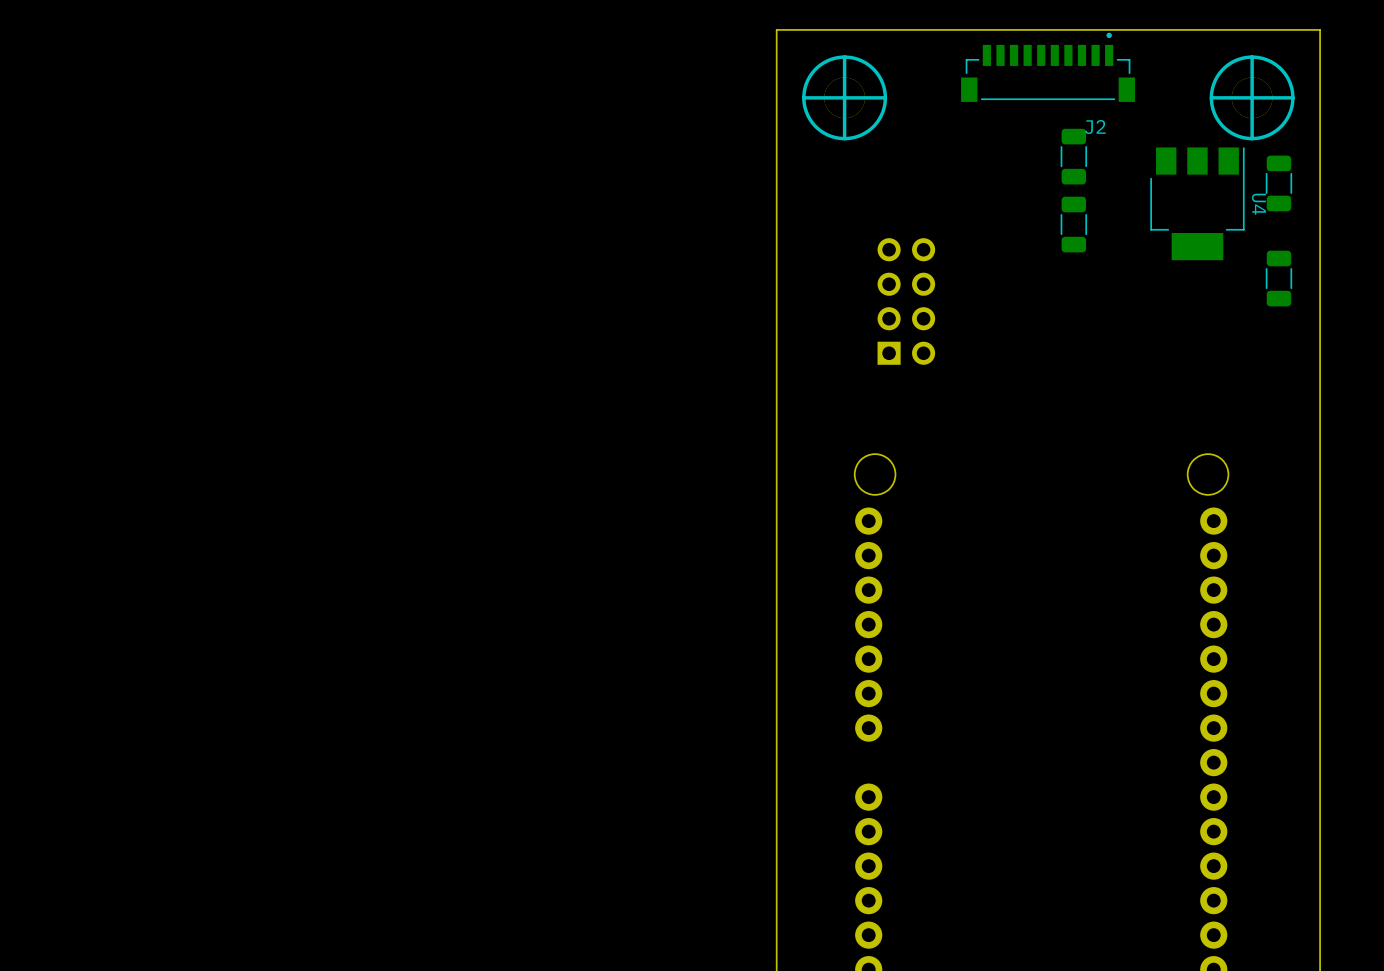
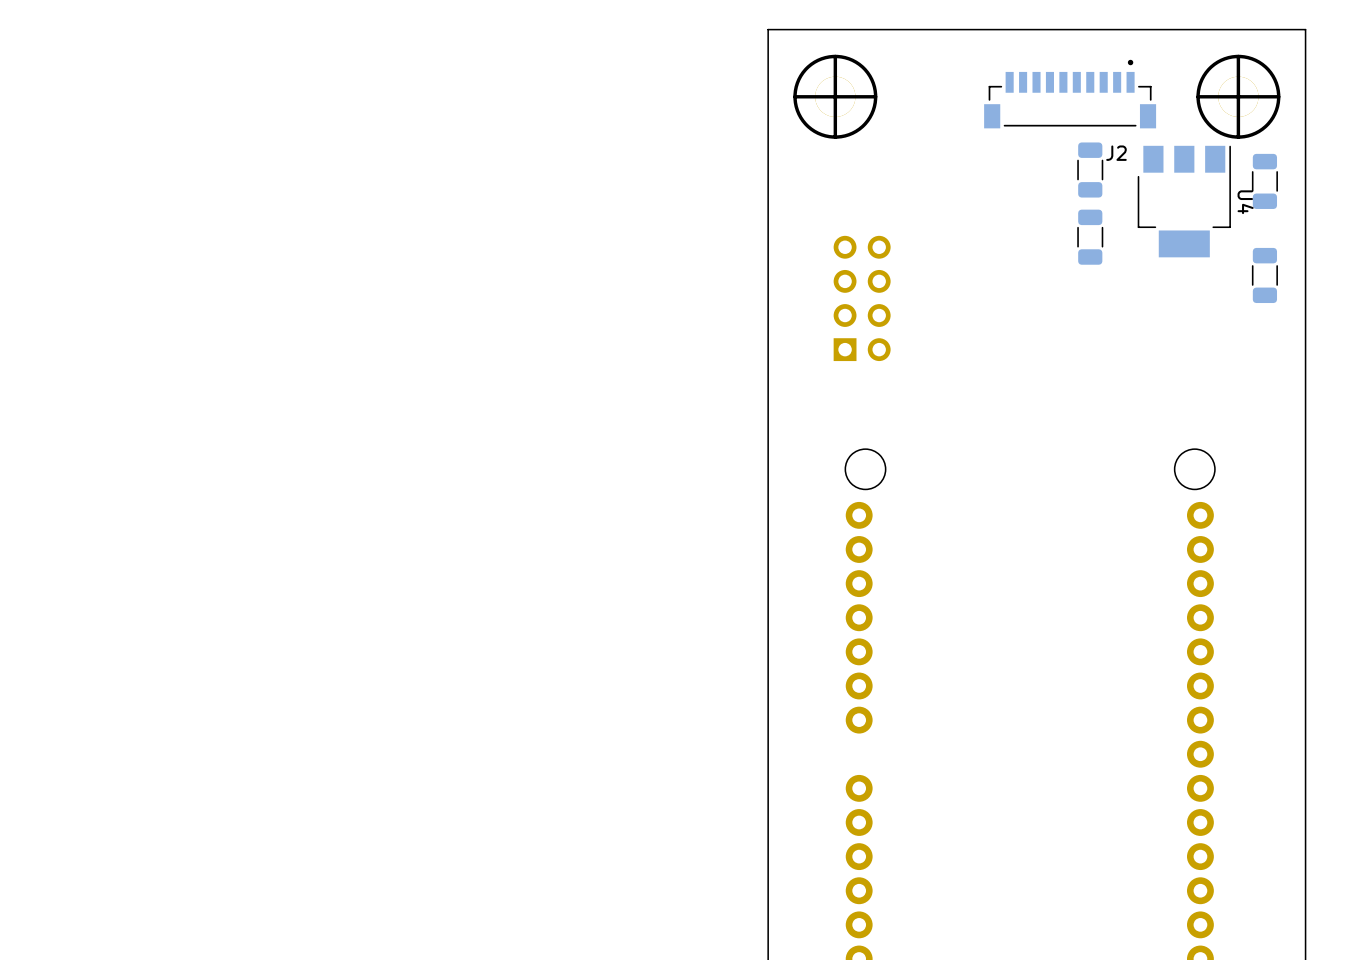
J2 position: (1048, 67) -> (1070, 94)
part: (1073, 156) -> none
part: none -> (1090, 170)
part: (1073, 224) -> none
part: none -> (1090, 237)
part position: (906, 301) -> (862, 298)

